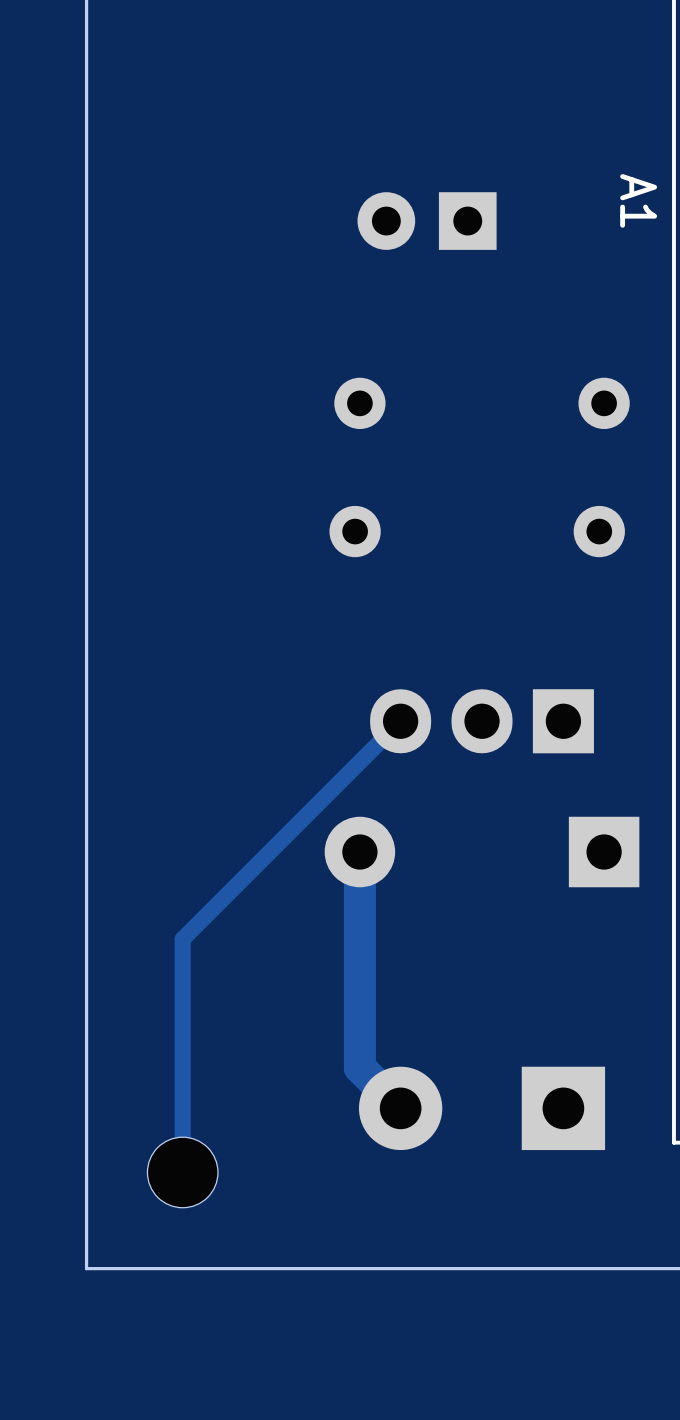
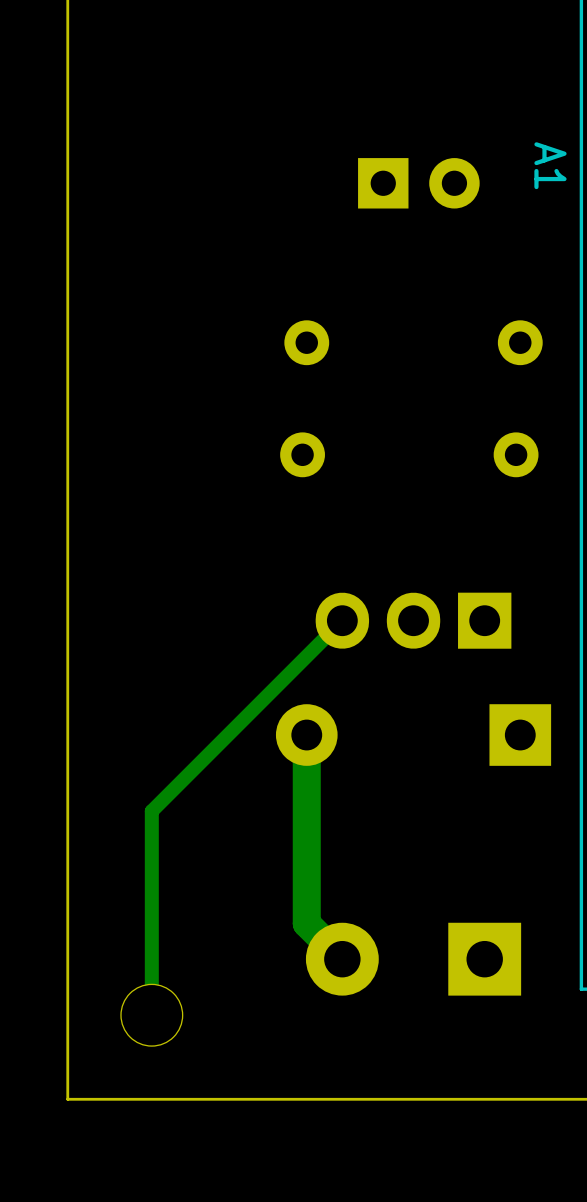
part rotation: 0° (427, 221) -> 180° (418, 183)

